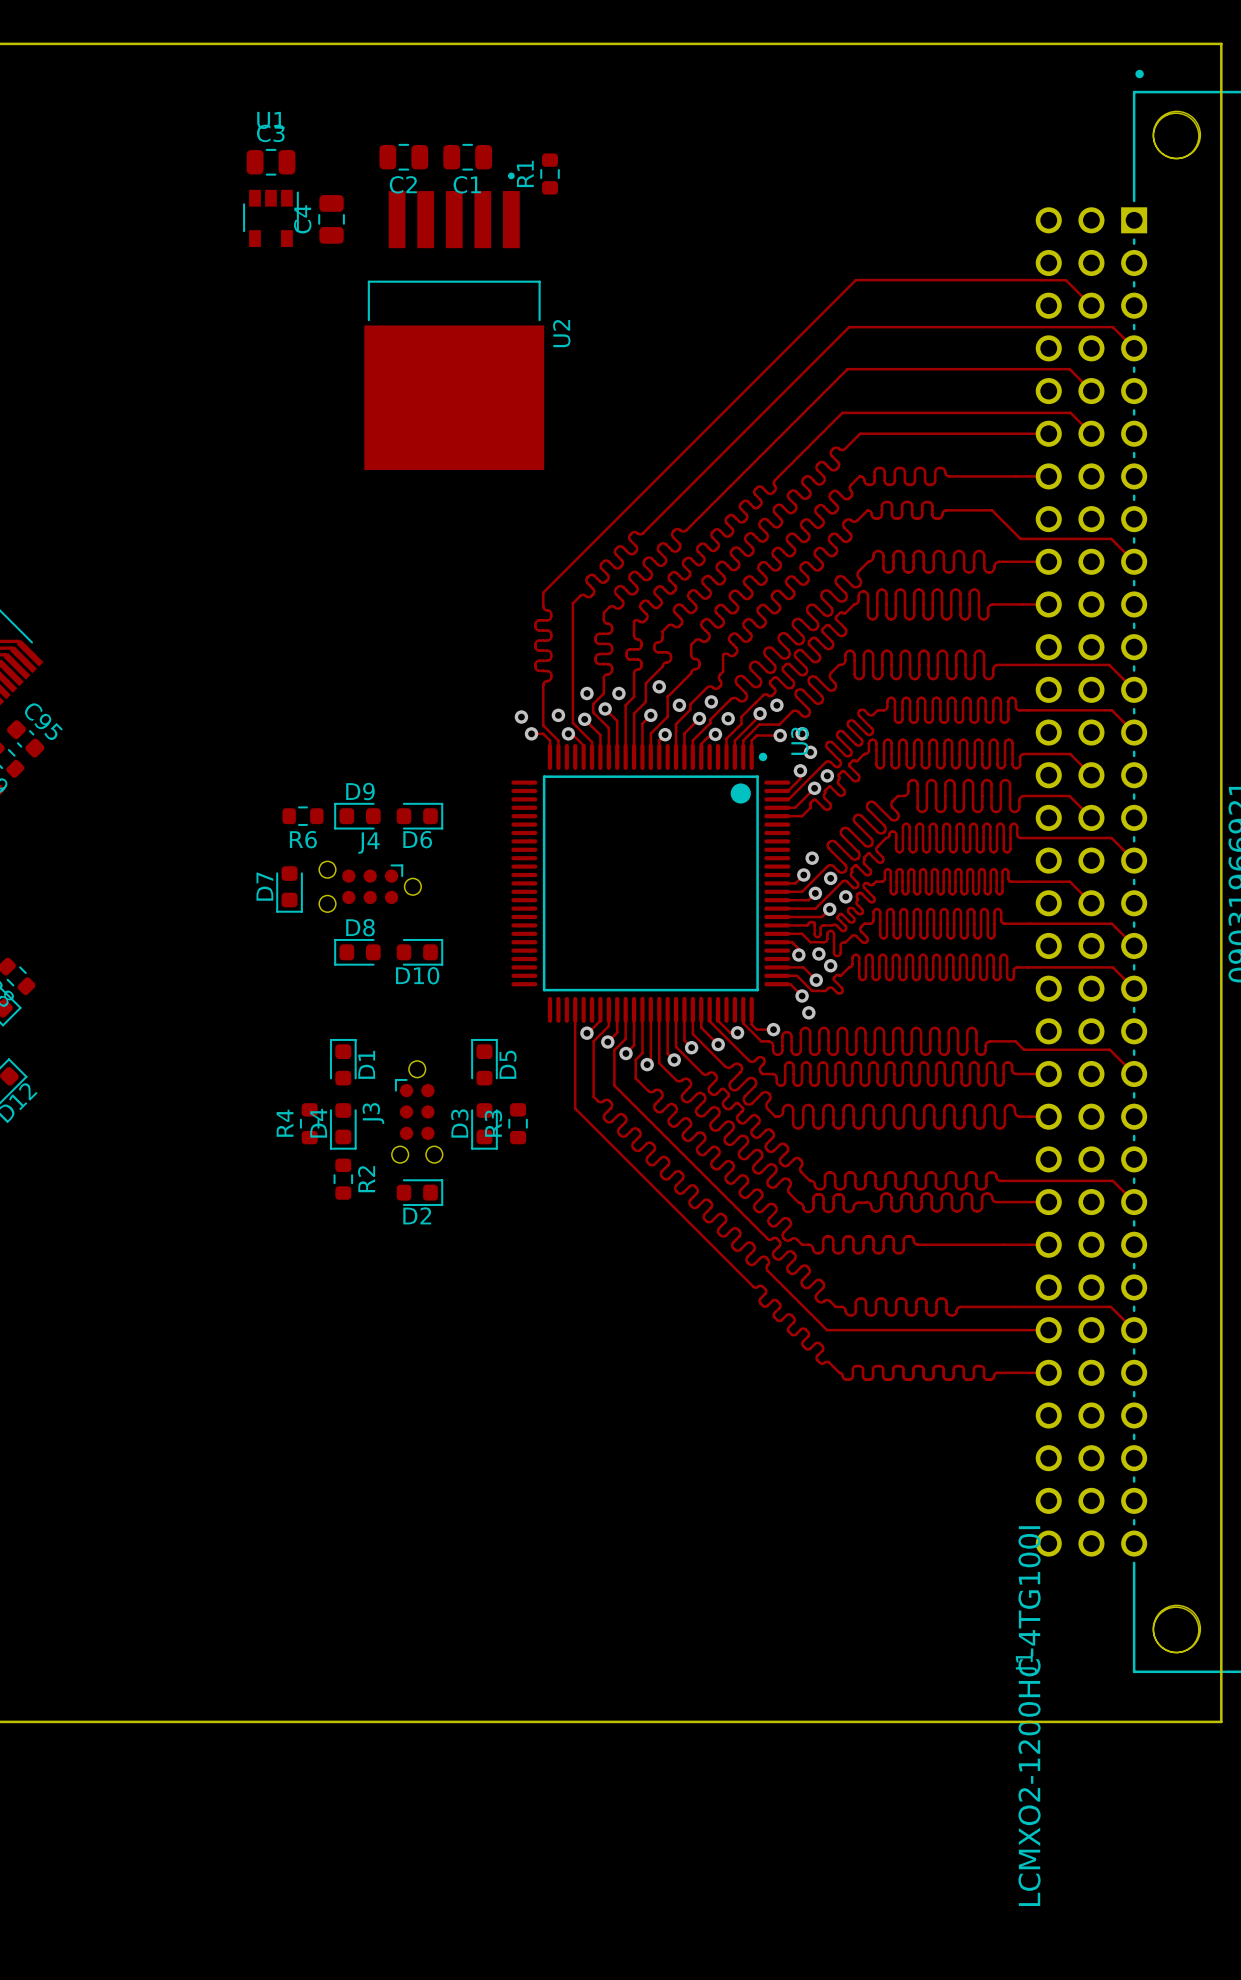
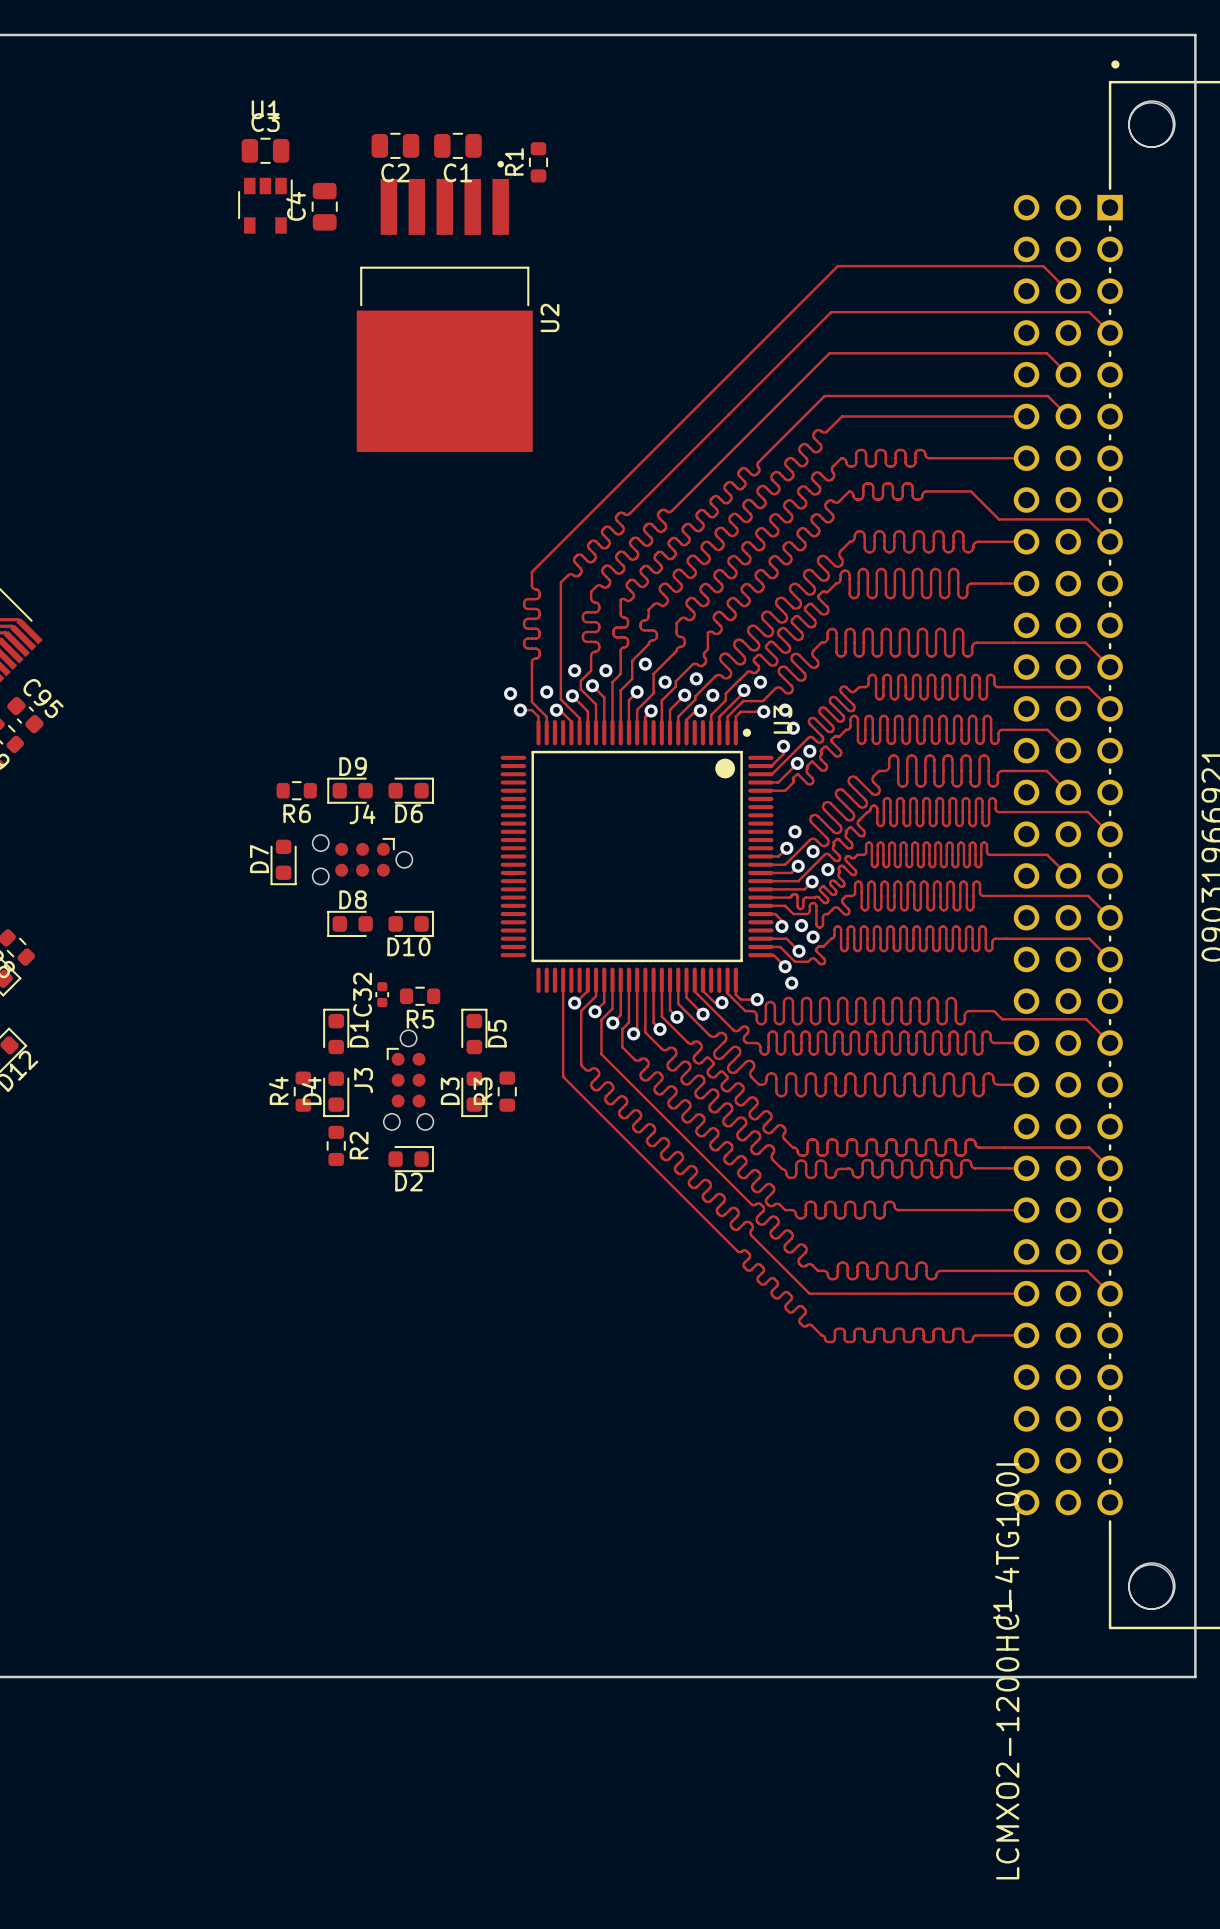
C32: none -> (382, 994)
R5: none -> (420, 996)

